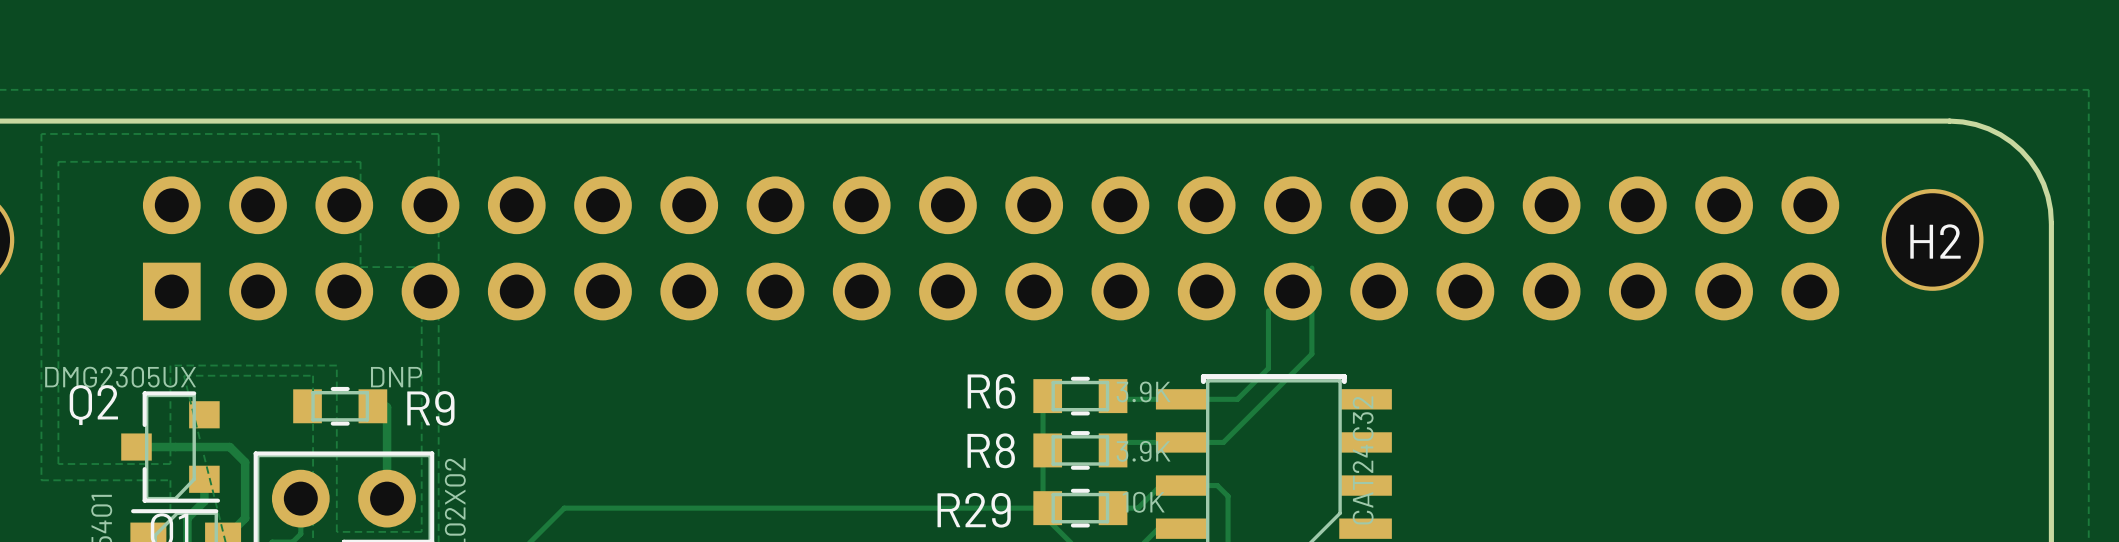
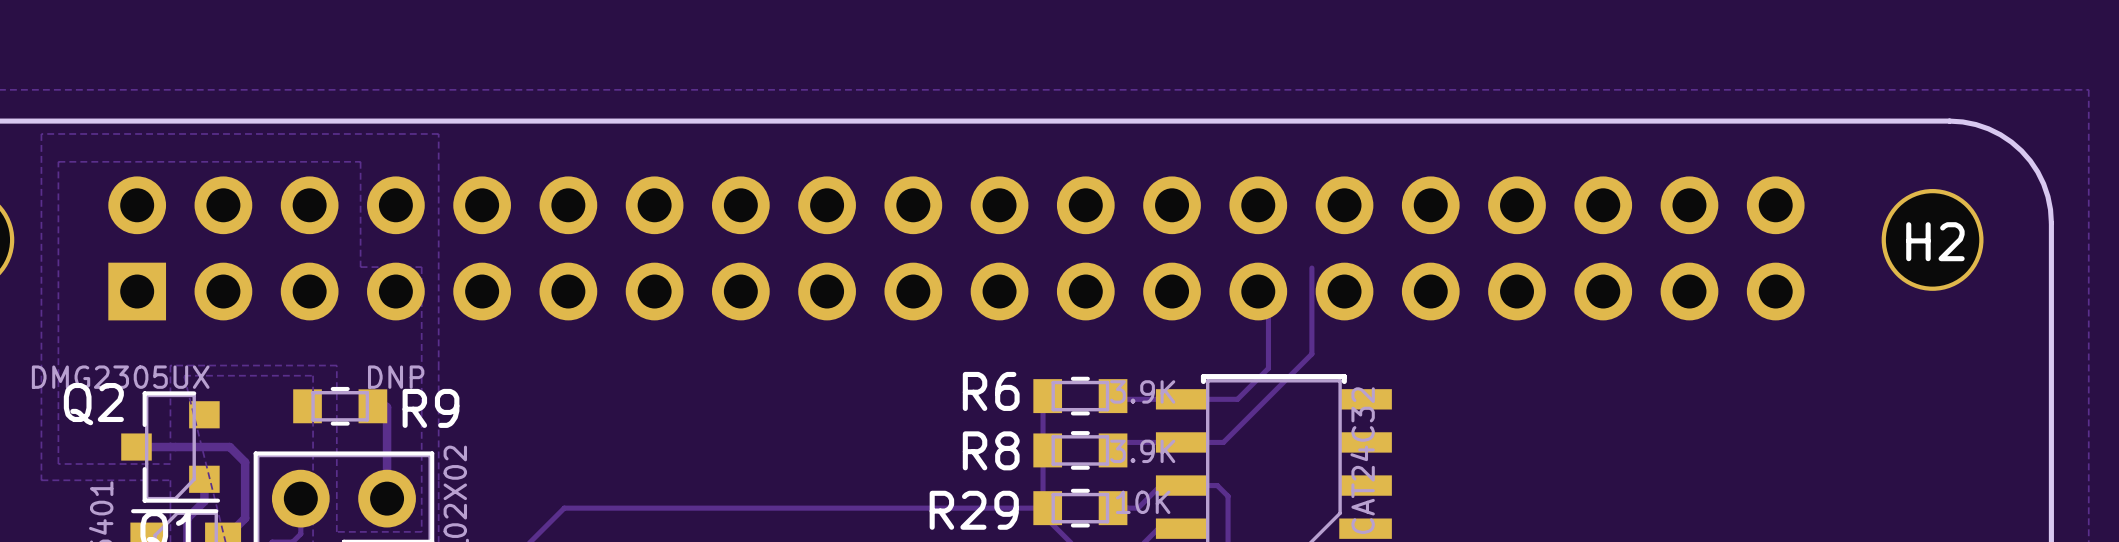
part position: (991, 248) -> (956, 248)

